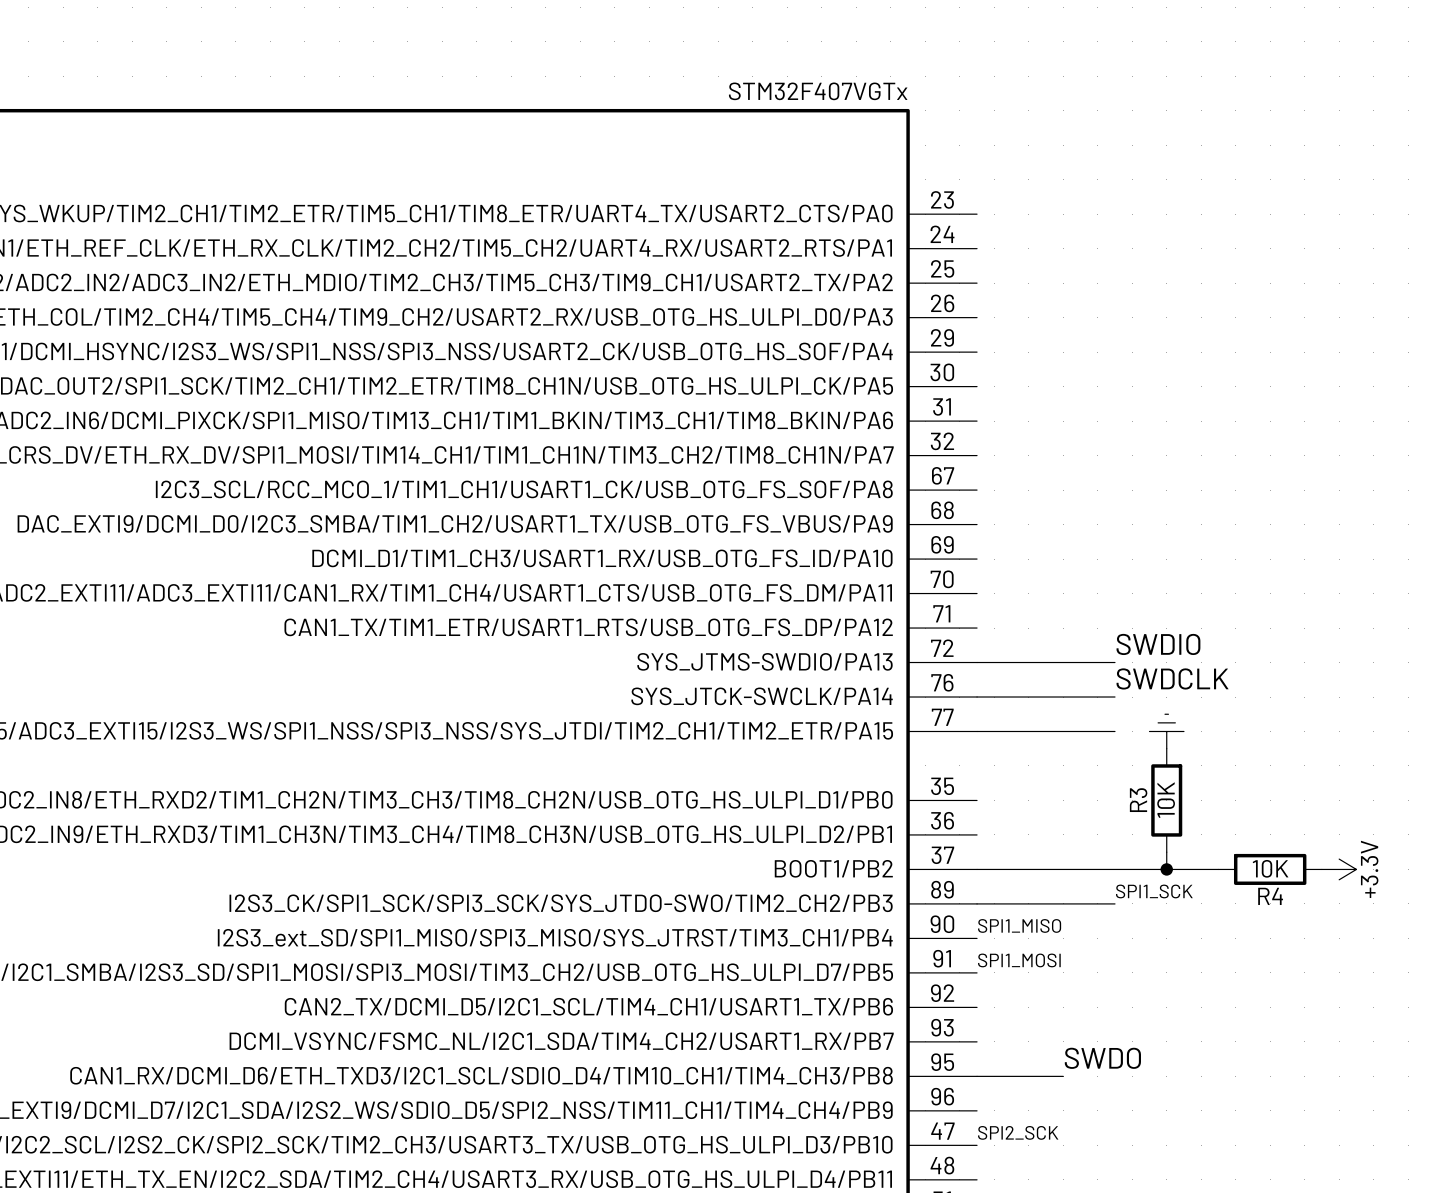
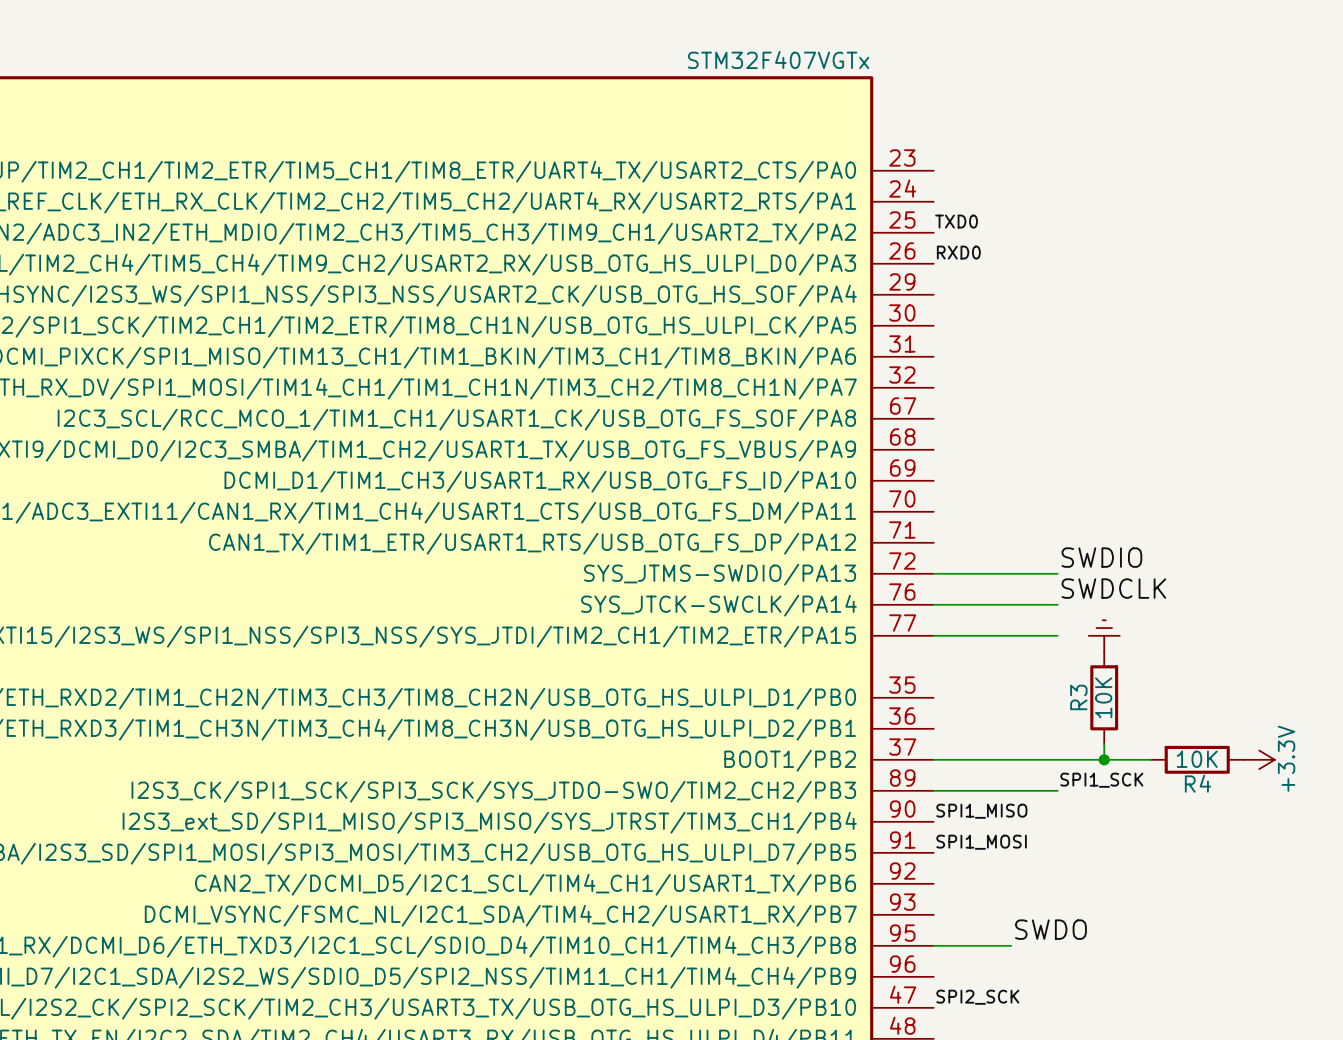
label: none -> TXD0 (956, 221)
label: none -> RXD0 (958, 252)

